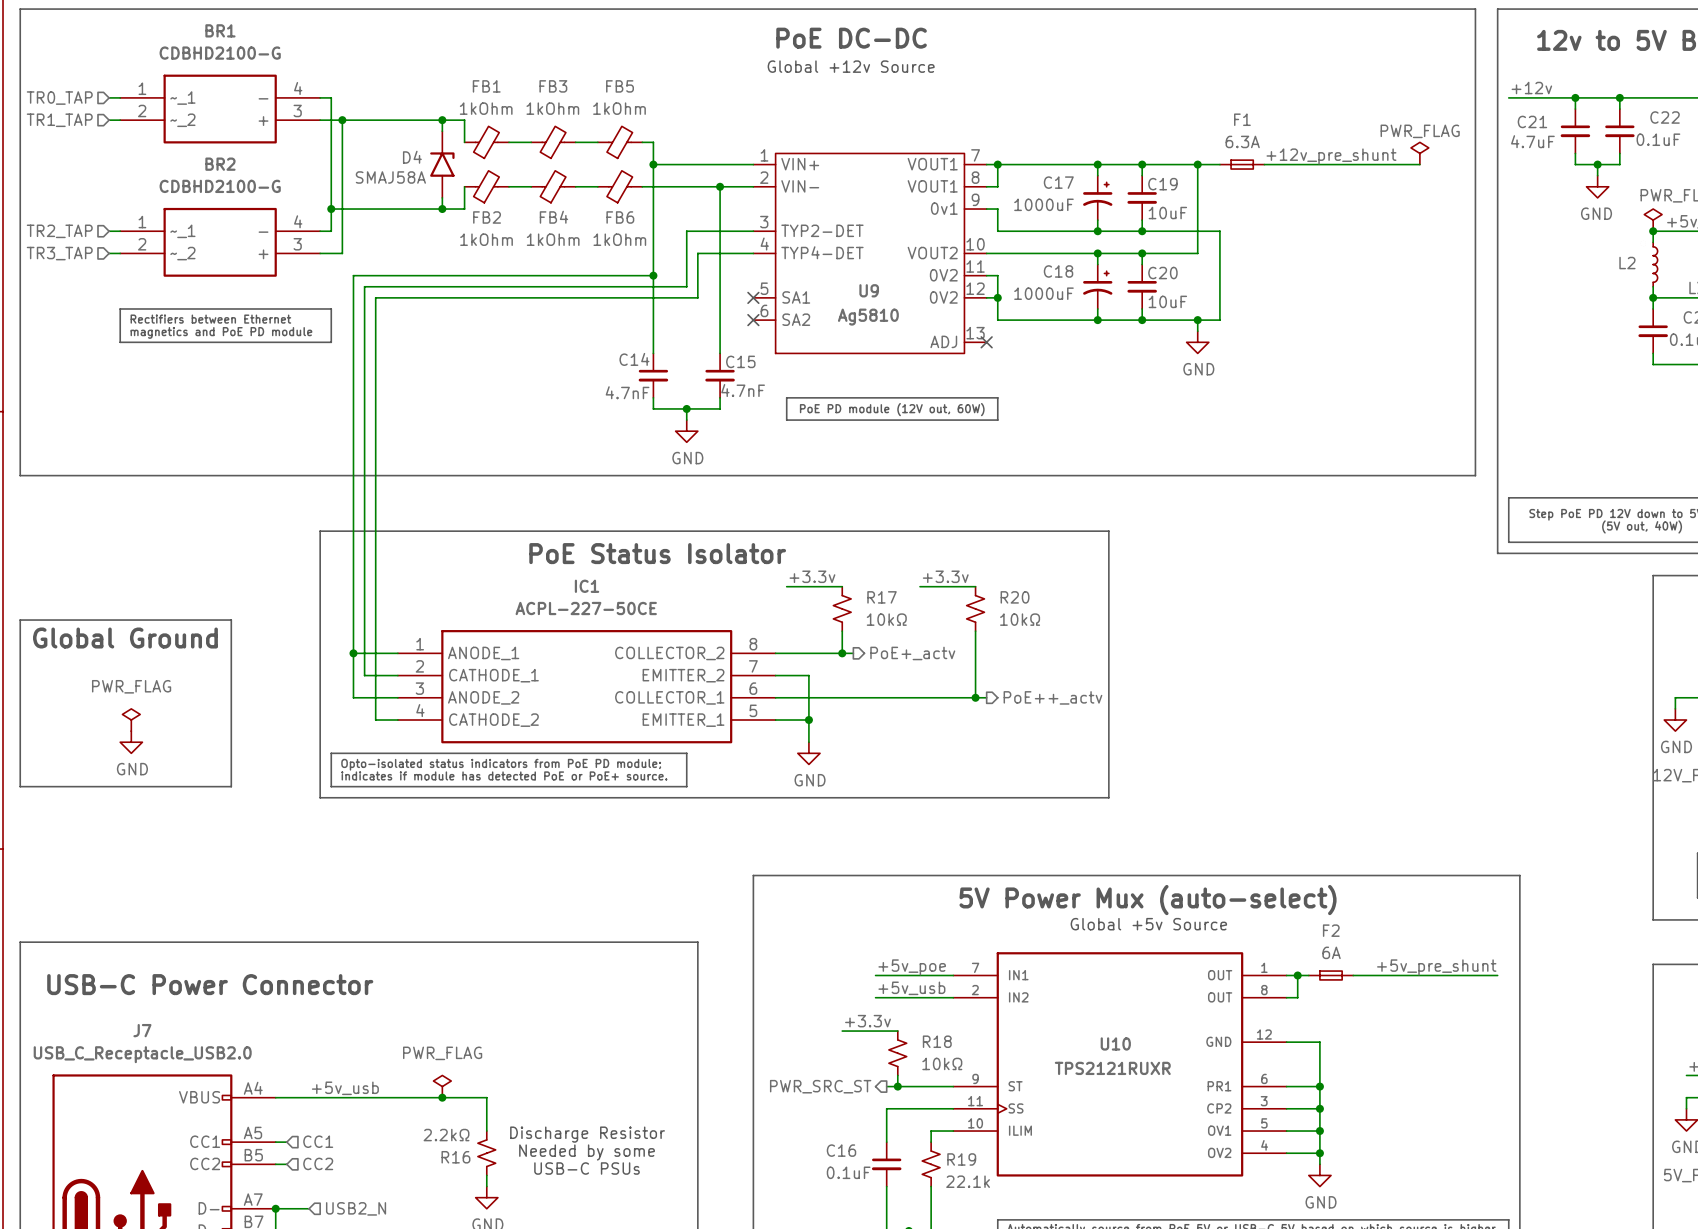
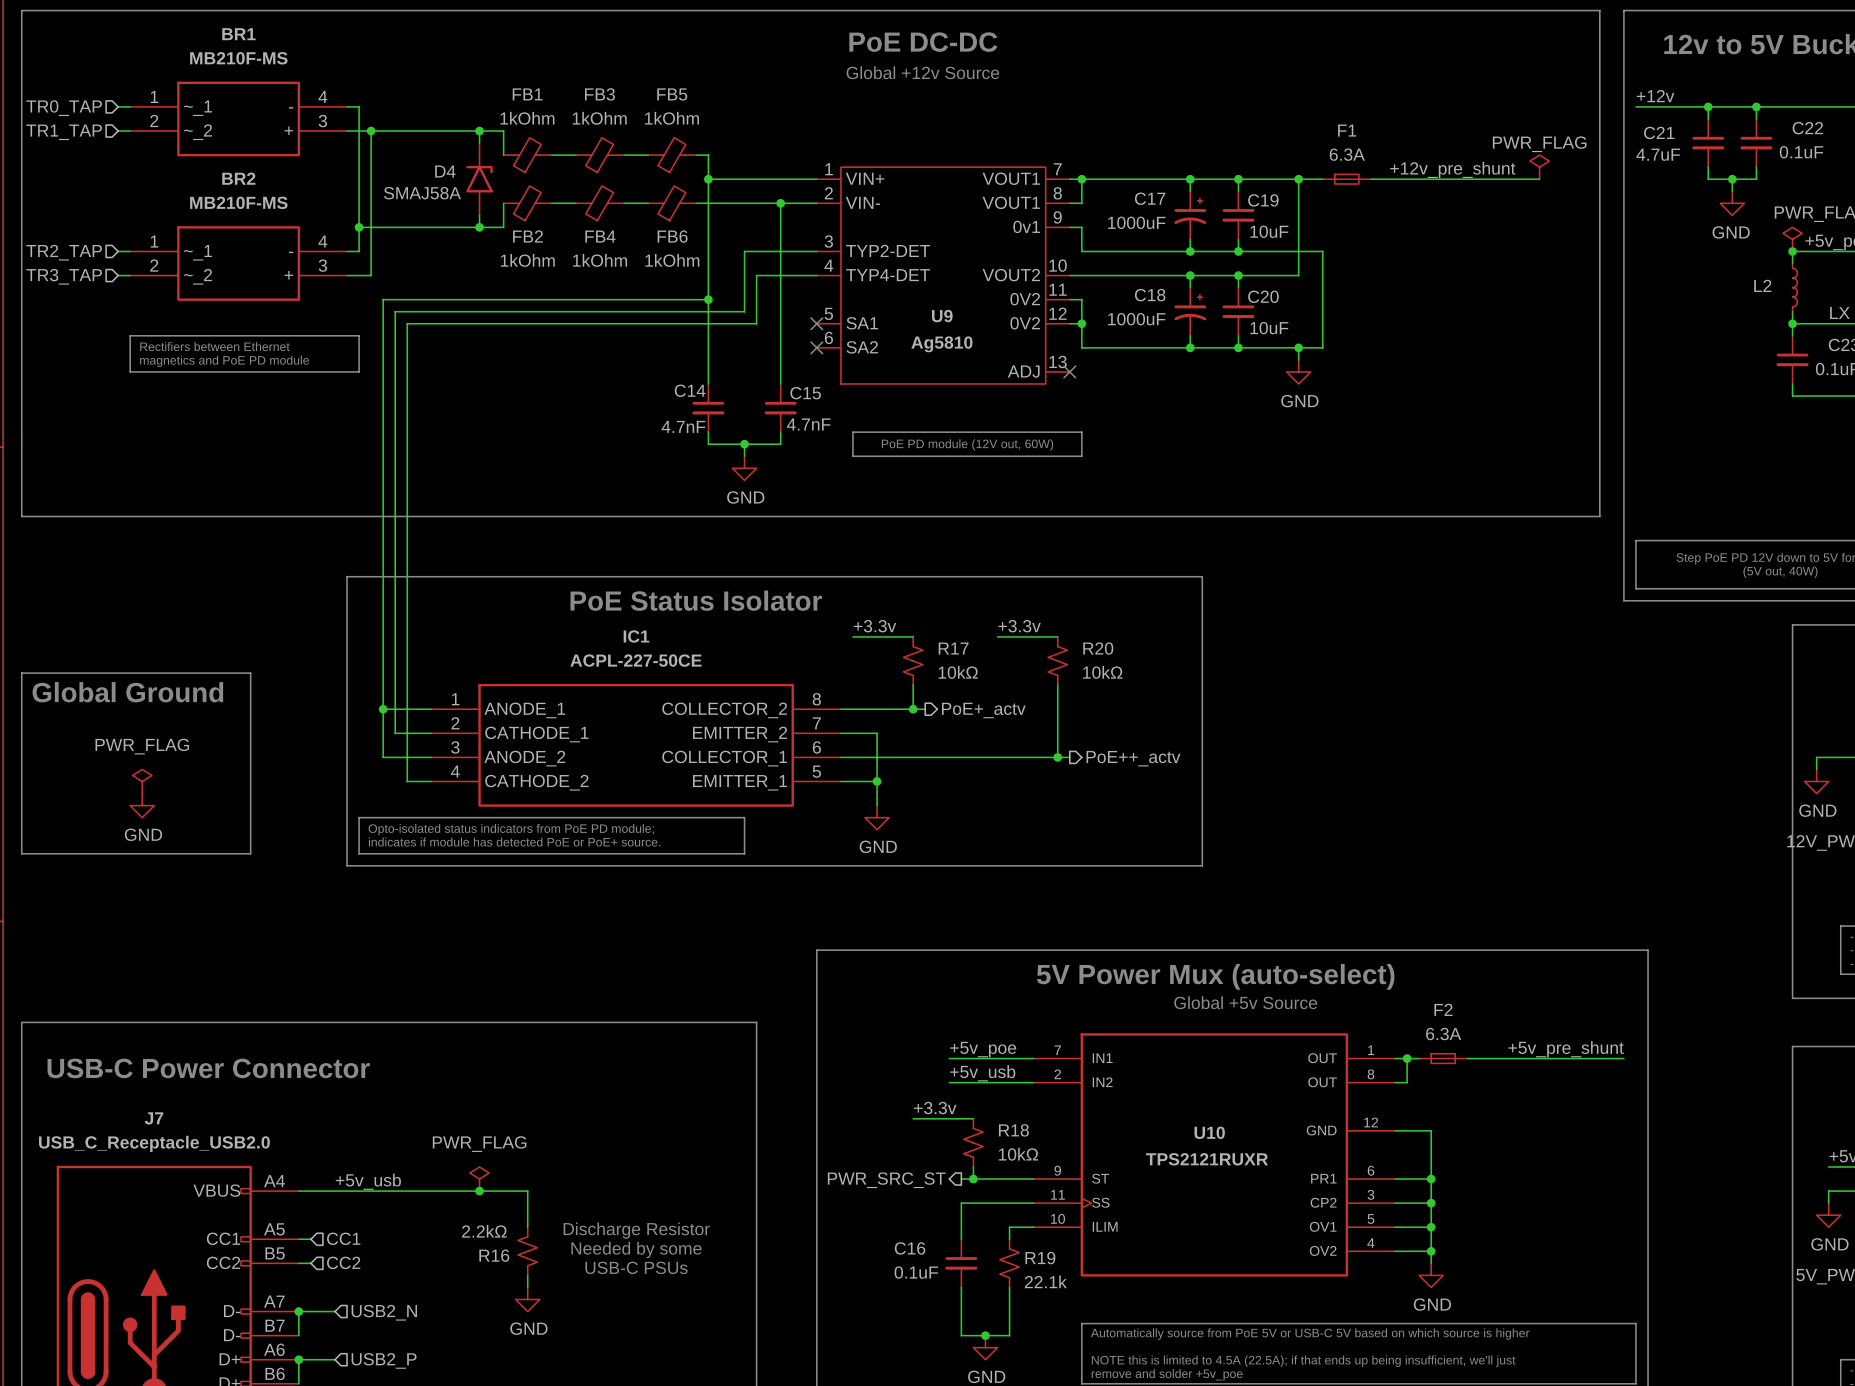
BR1 value: CDBHD2100-G (220, 53) -> MB210F-MS (238, 58)
BR2 value: CDBHD2100-G (220, 186) -> MB210F-MS (238, 202)
F2 value: 6A (1331, 952) -> 6.3A (1443, 1034)

